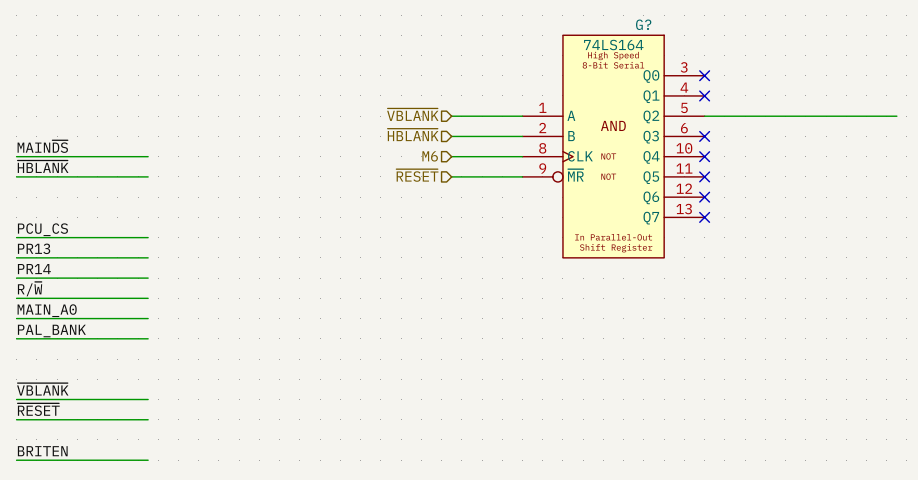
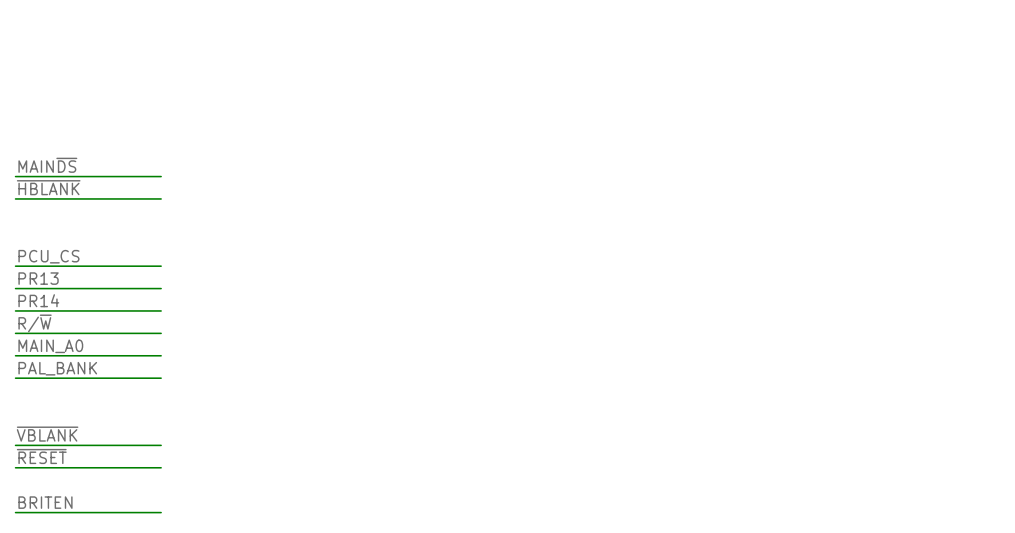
no-connect mark: (704, 75) -> none
no-connect mark: (704, 95) -> none
hierarchical label: ~{VBLANK} (412, 114) -> none
wire: (451, 116) (522, 116) -> none
wire: (704, 116) (896, 116) -> none
hierarchical label: ~{HBLANK} (413, 134) -> none
wire: (451, 136) (522, 136) -> none
no-connect mark: (704, 136) -> none
G?: 74LS164 (613, 146) -> none
hierarchical label: M6 (430, 156) -> none
wire: (451, 156) (522, 156) -> none
no-connect mark: (704, 156) -> none
hierarchical label: ~{RESET} (417, 175) -> none
wire: (451, 176) (522, 176) -> none
no-connect mark: (704, 176) -> none
no-connect mark: (704, 197) -> none
no-connect mark: (704, 217) -> none

